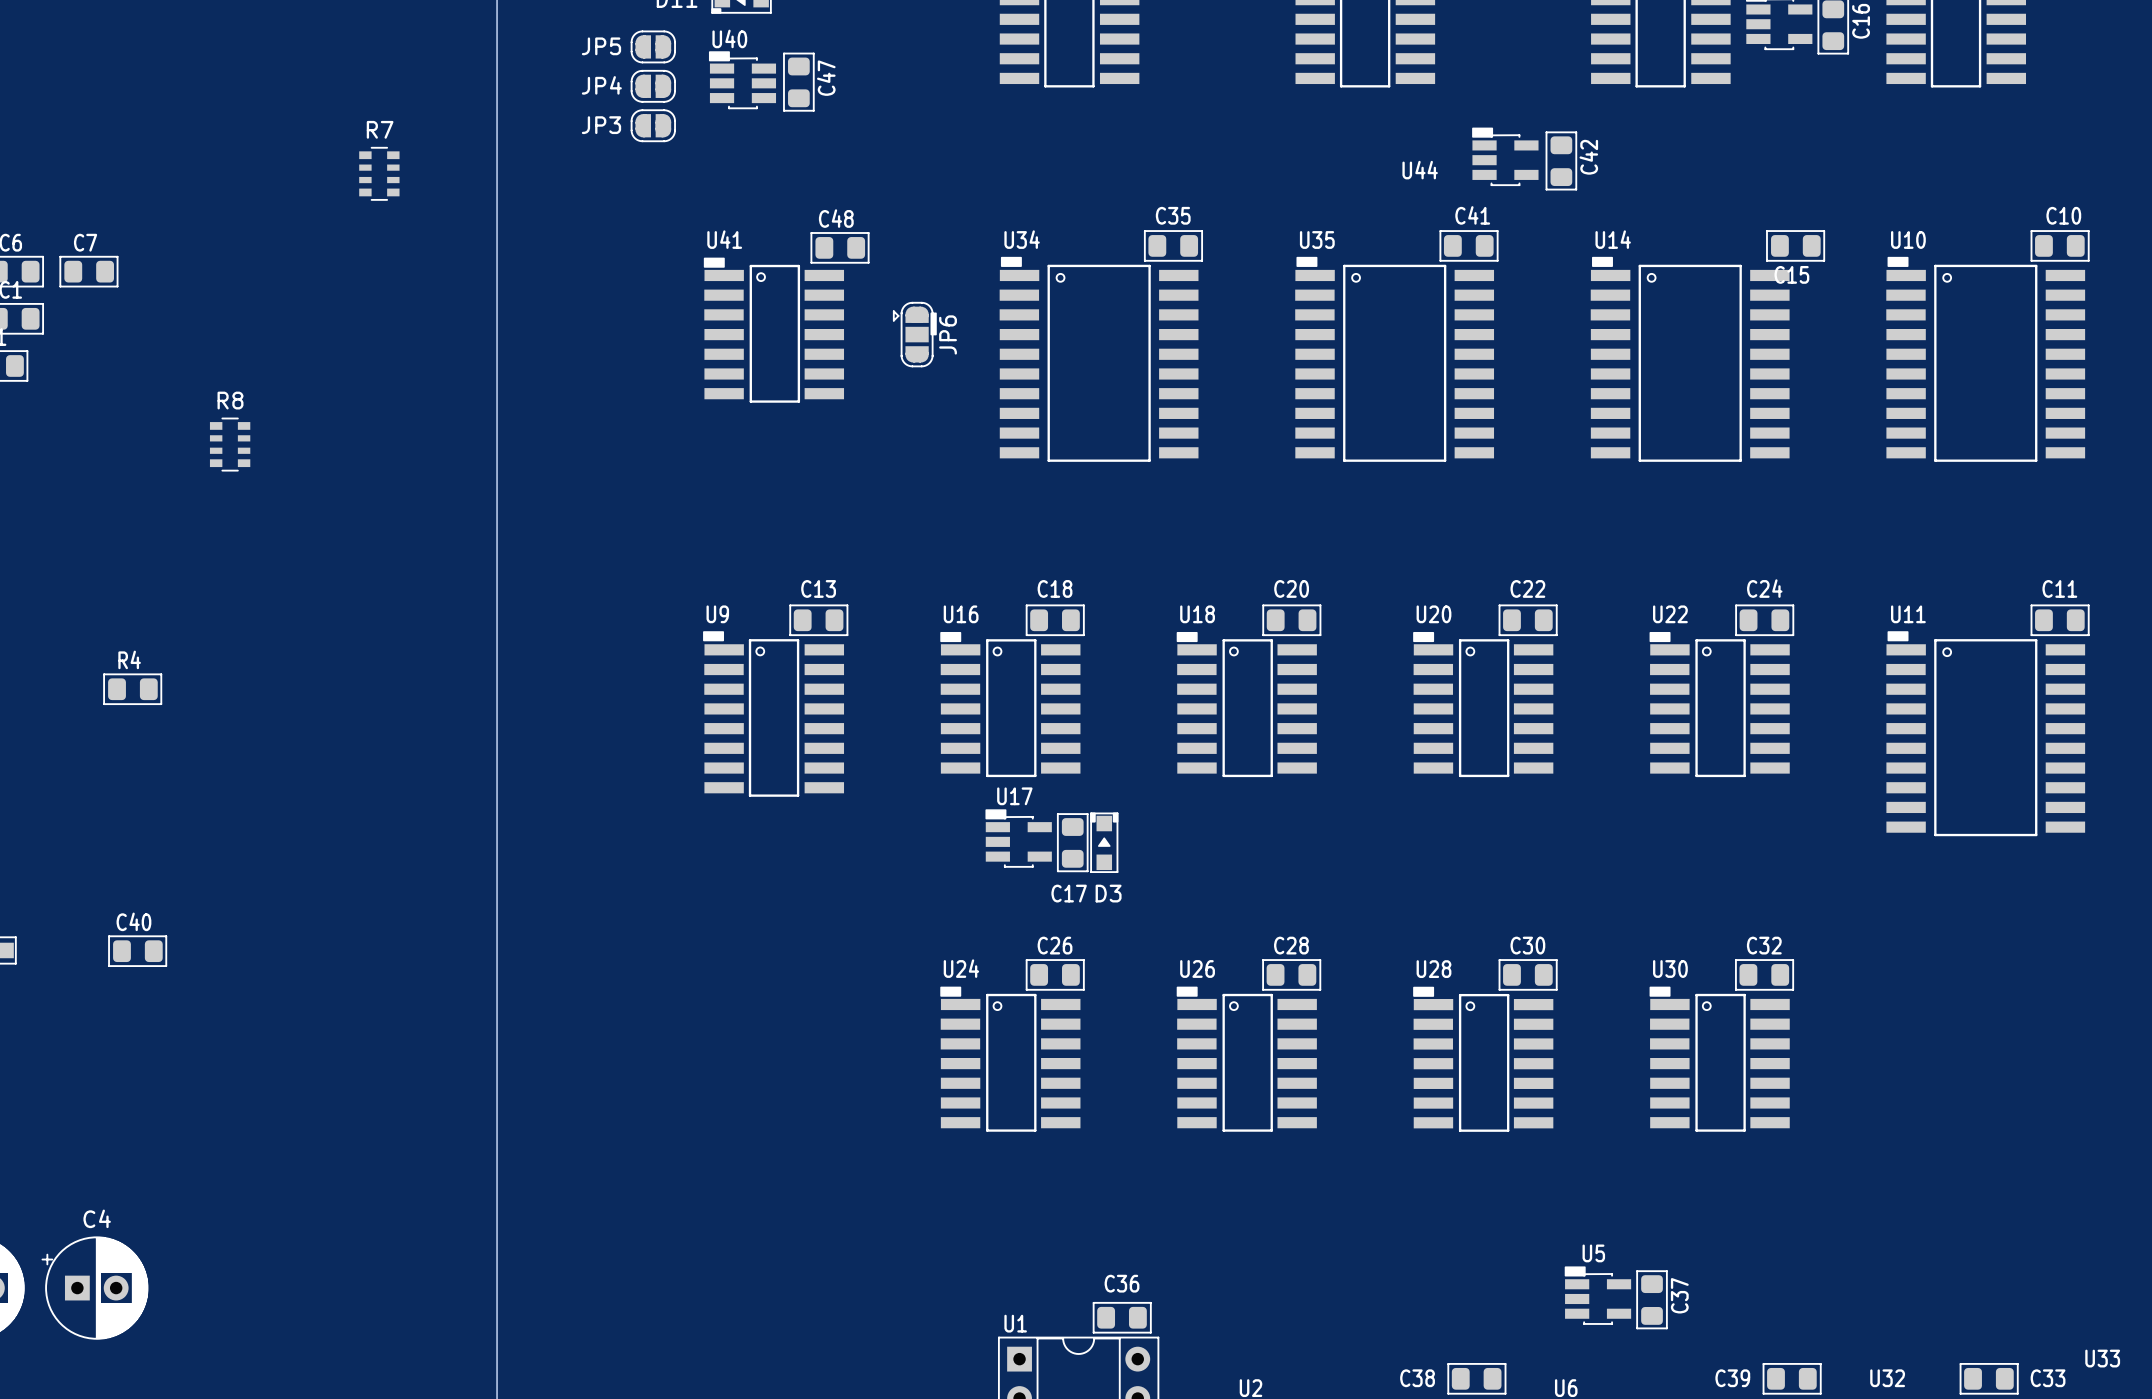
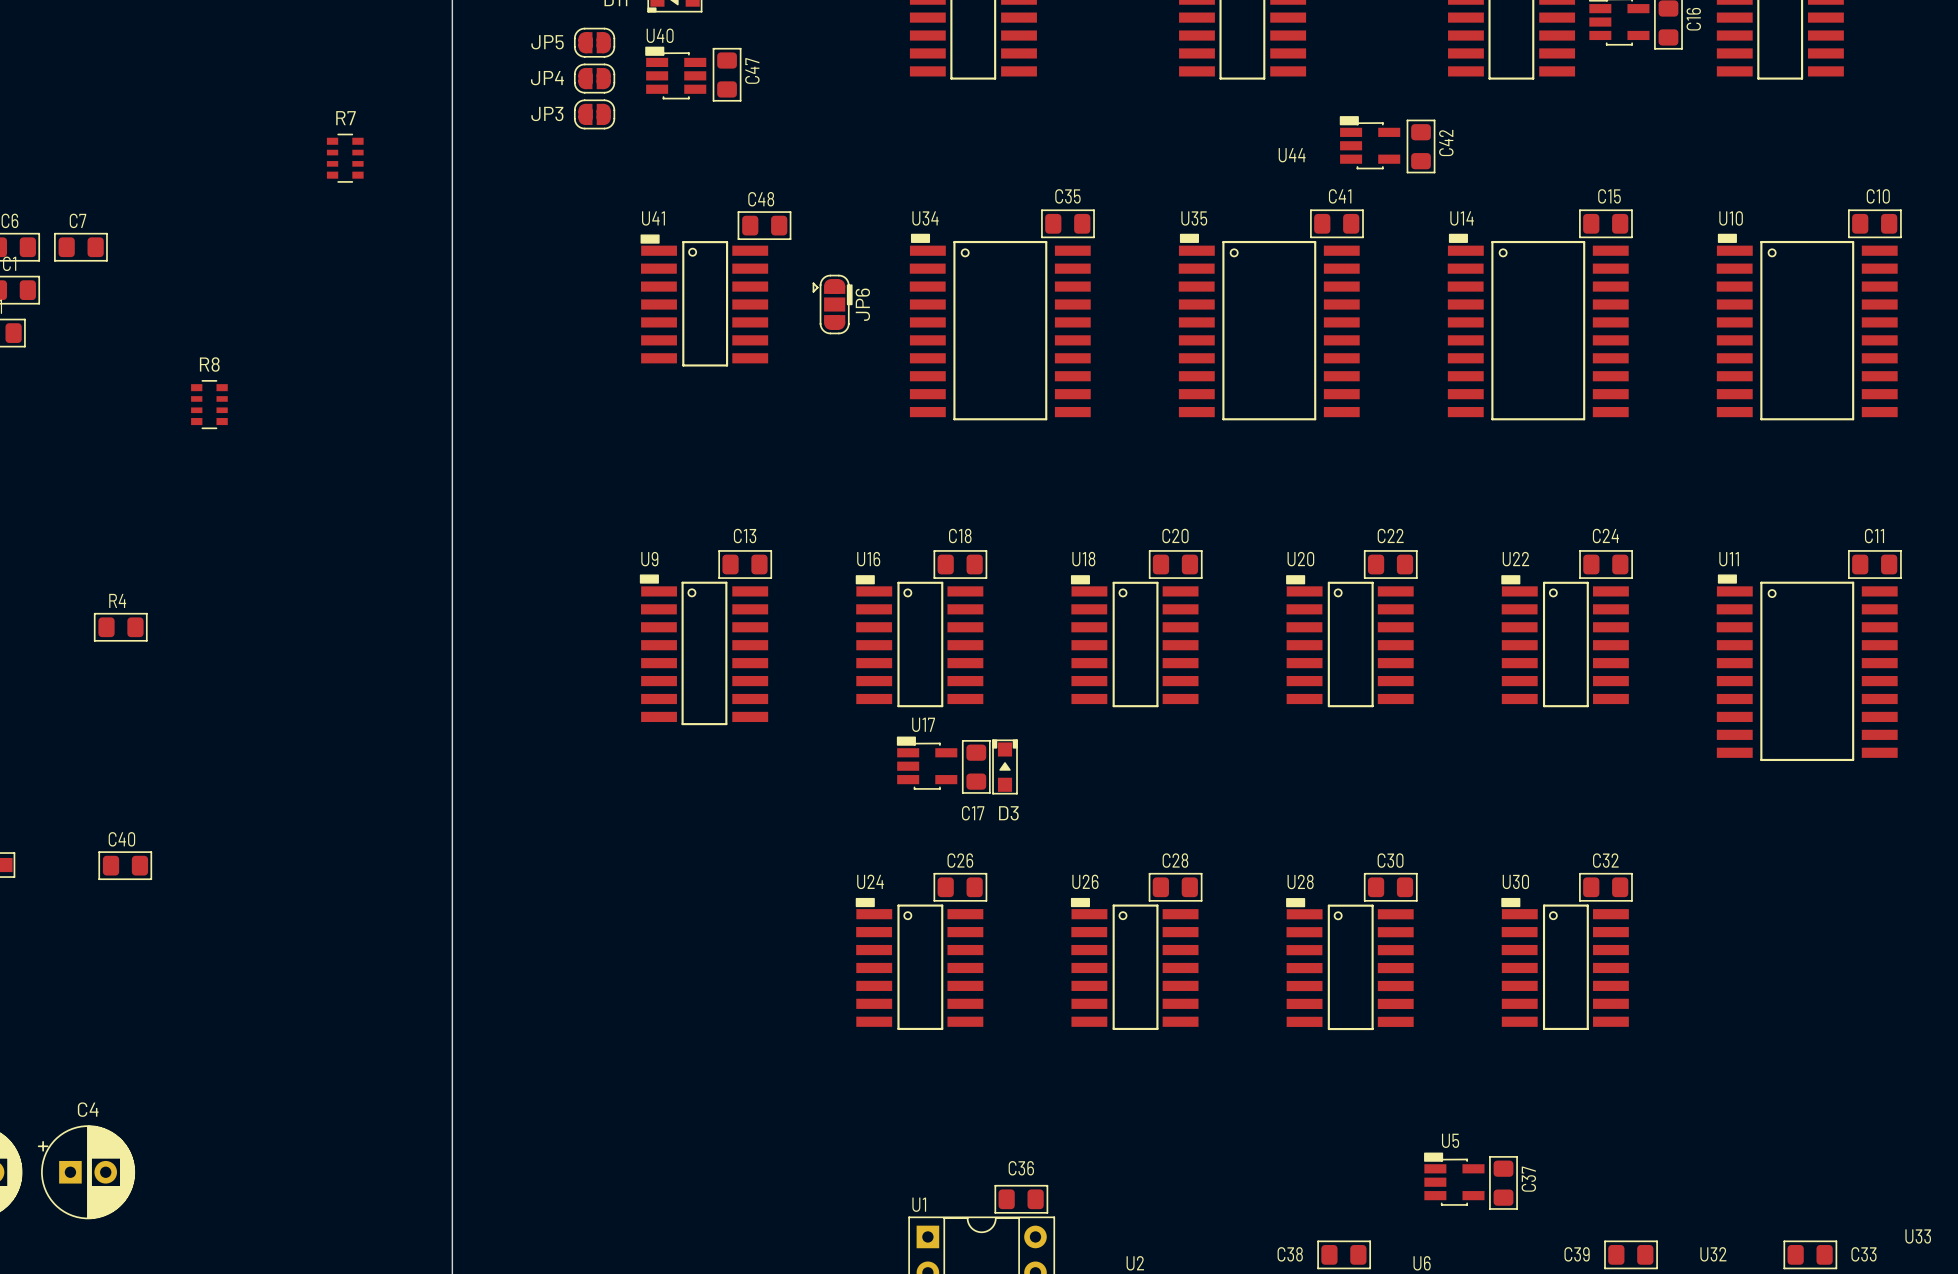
C15 rotation: 0° (1795, 245) -> 180° (1605, 223)

